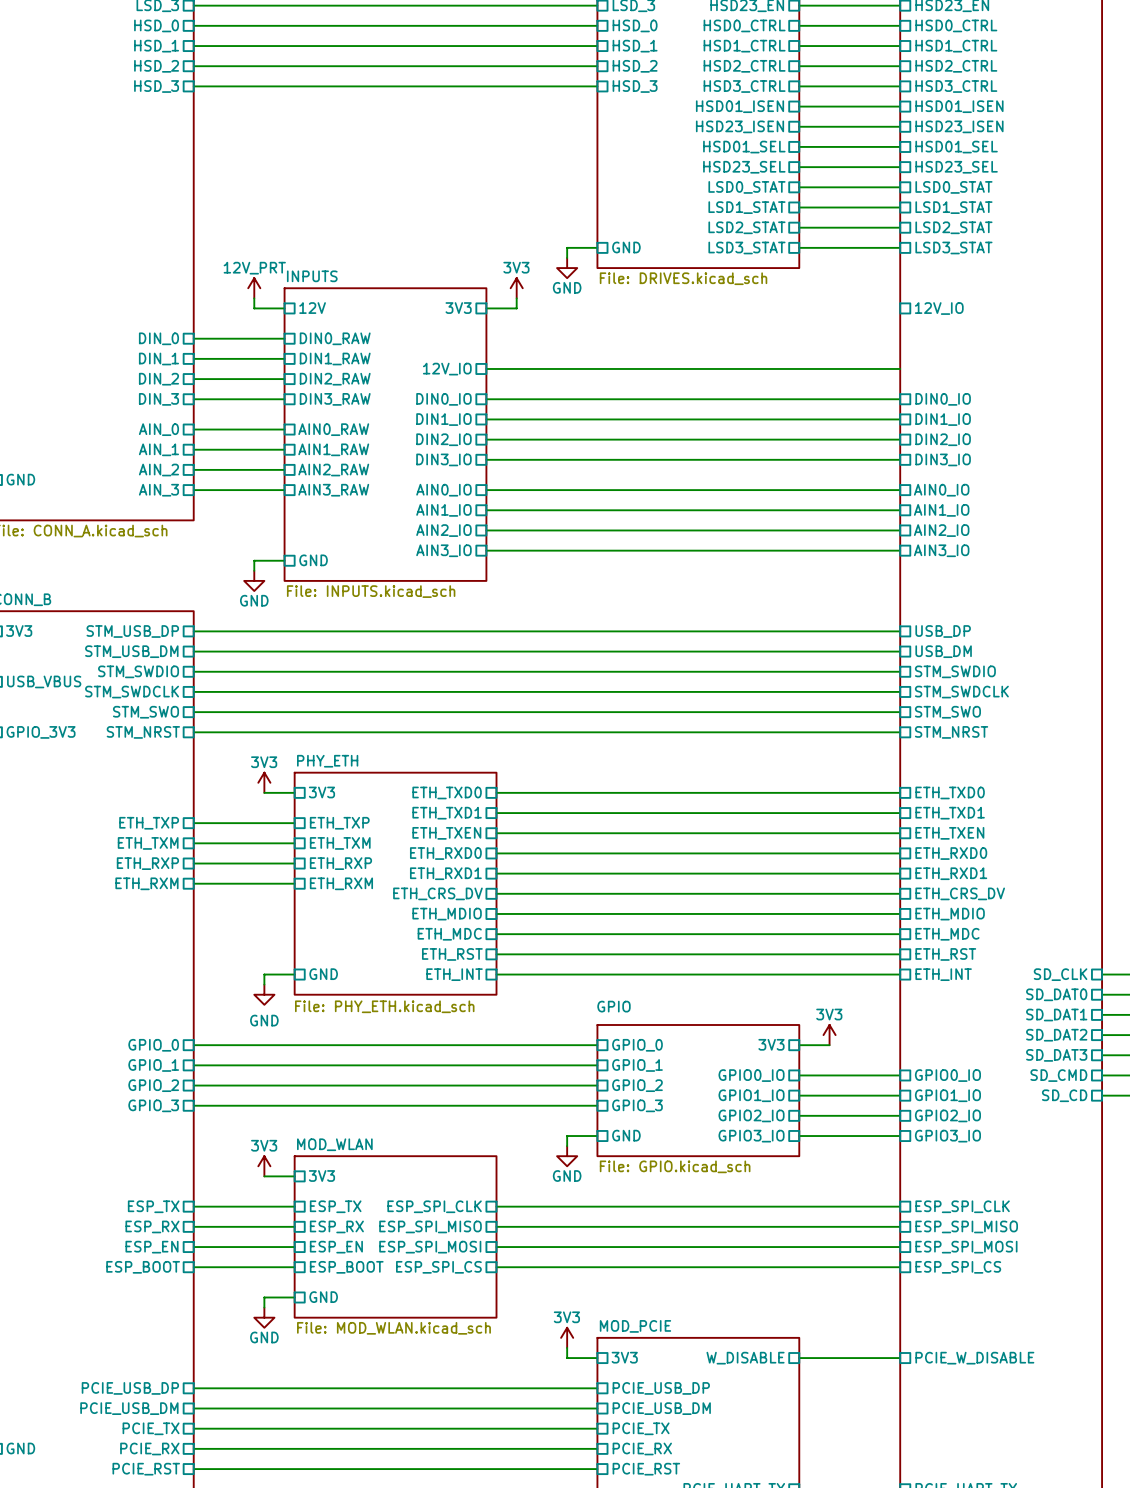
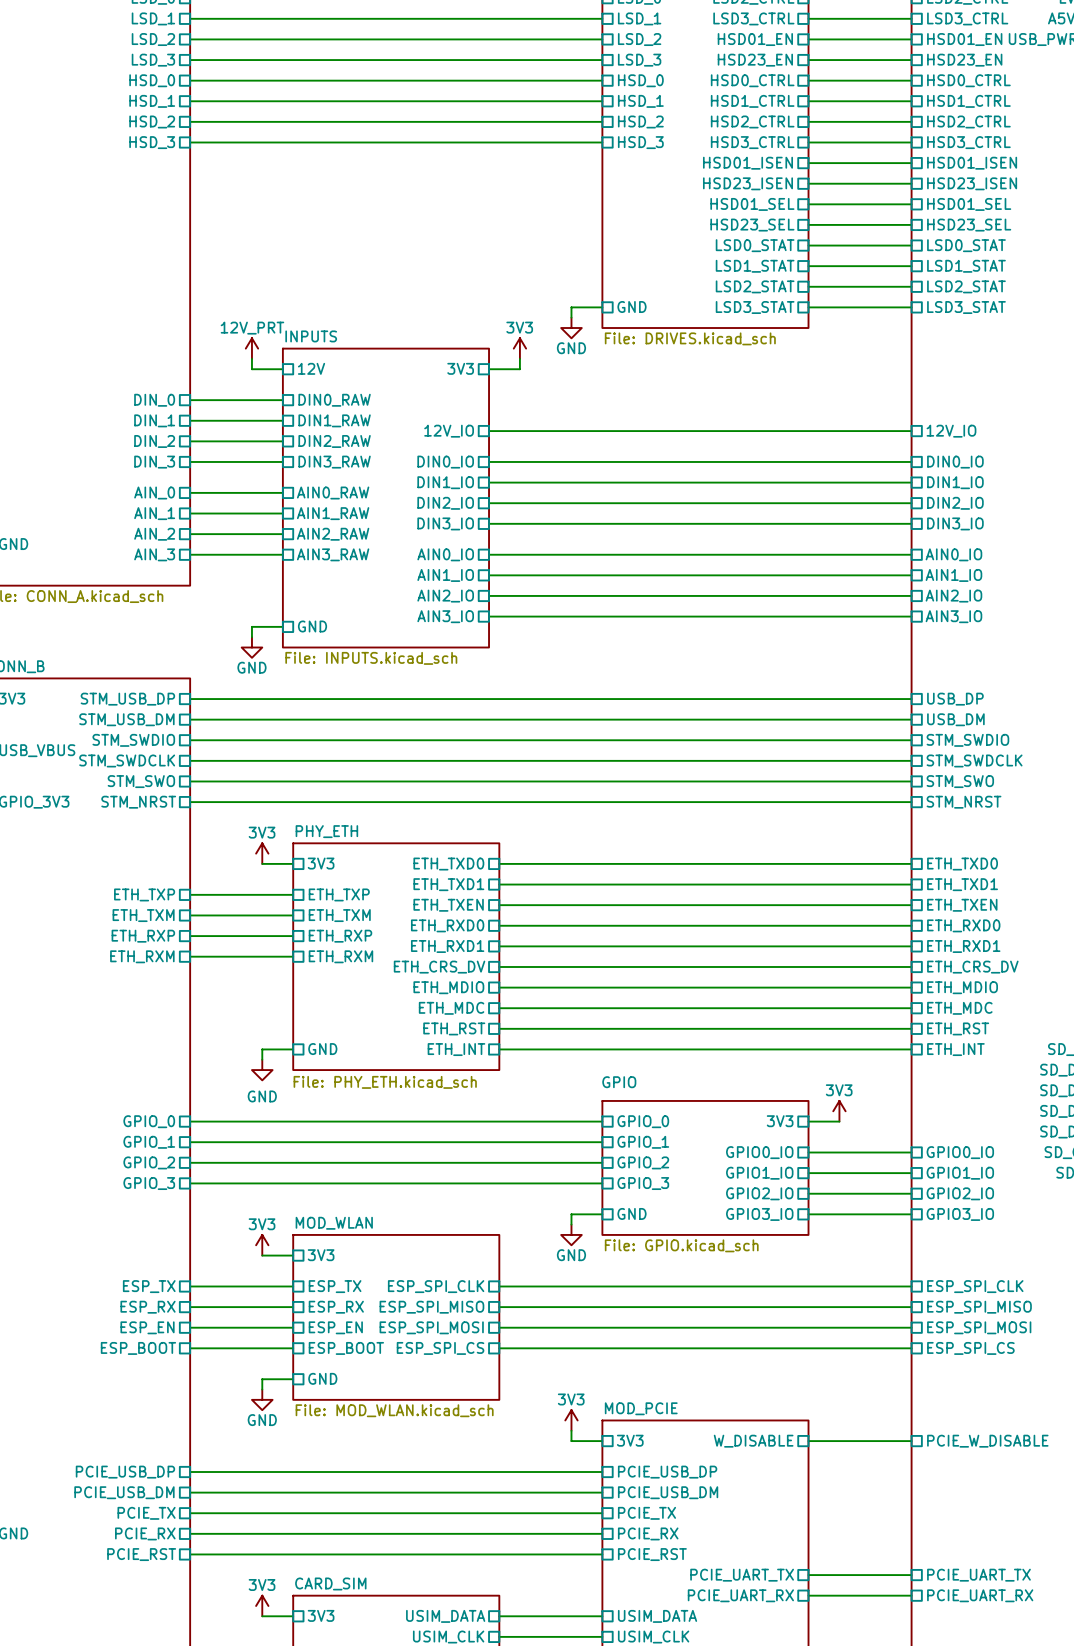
sheet pin position: 12V_IO (939, 308) -> 12V_IO (951, 431)

